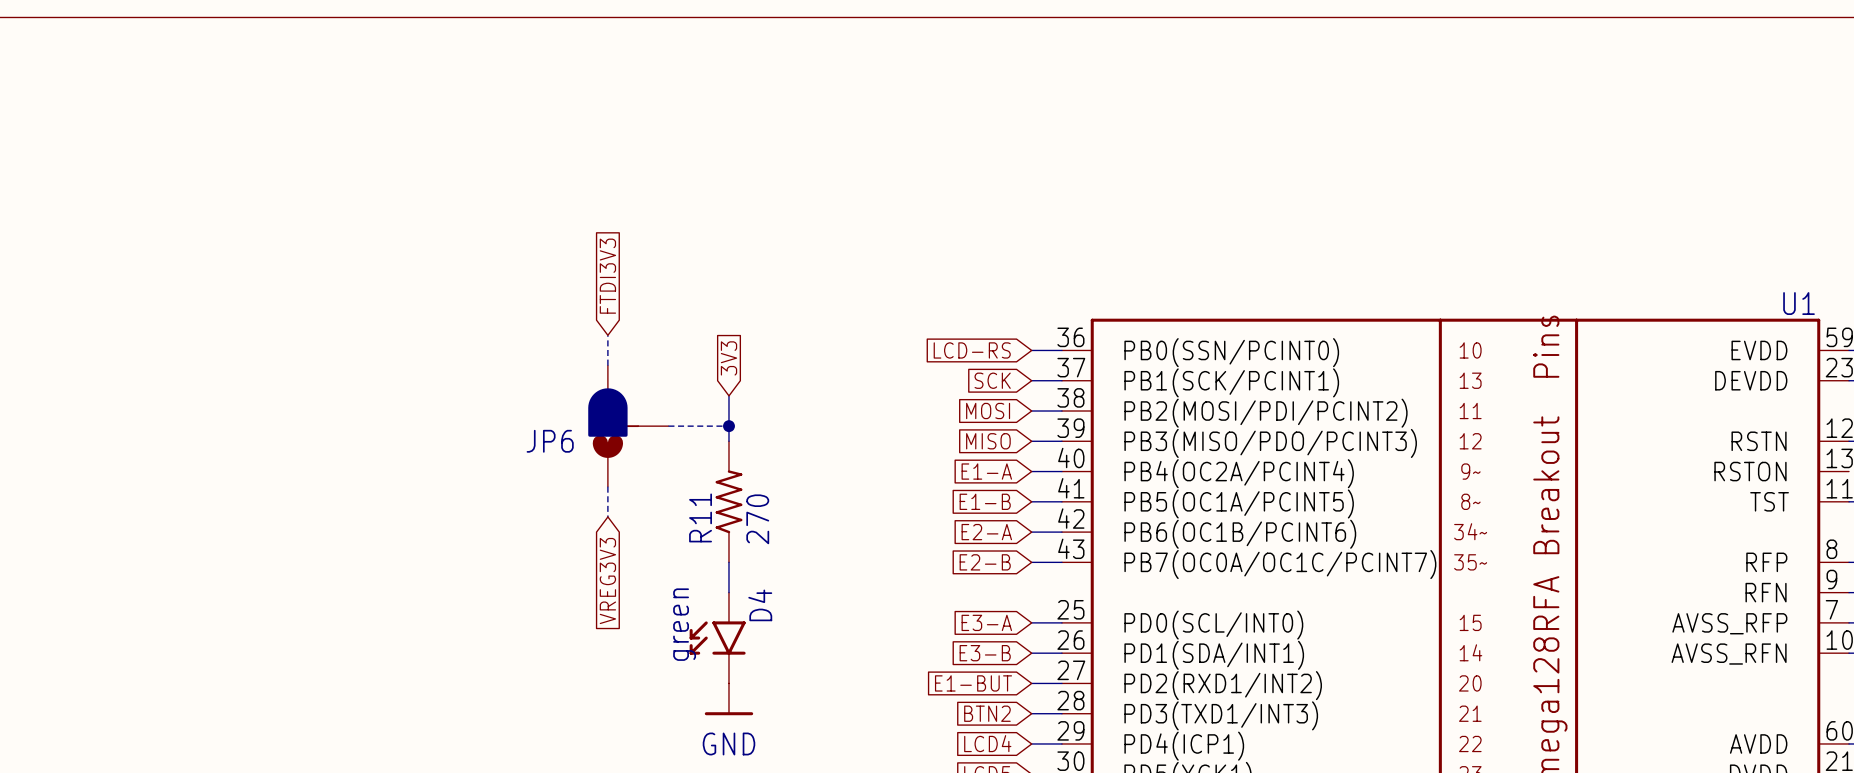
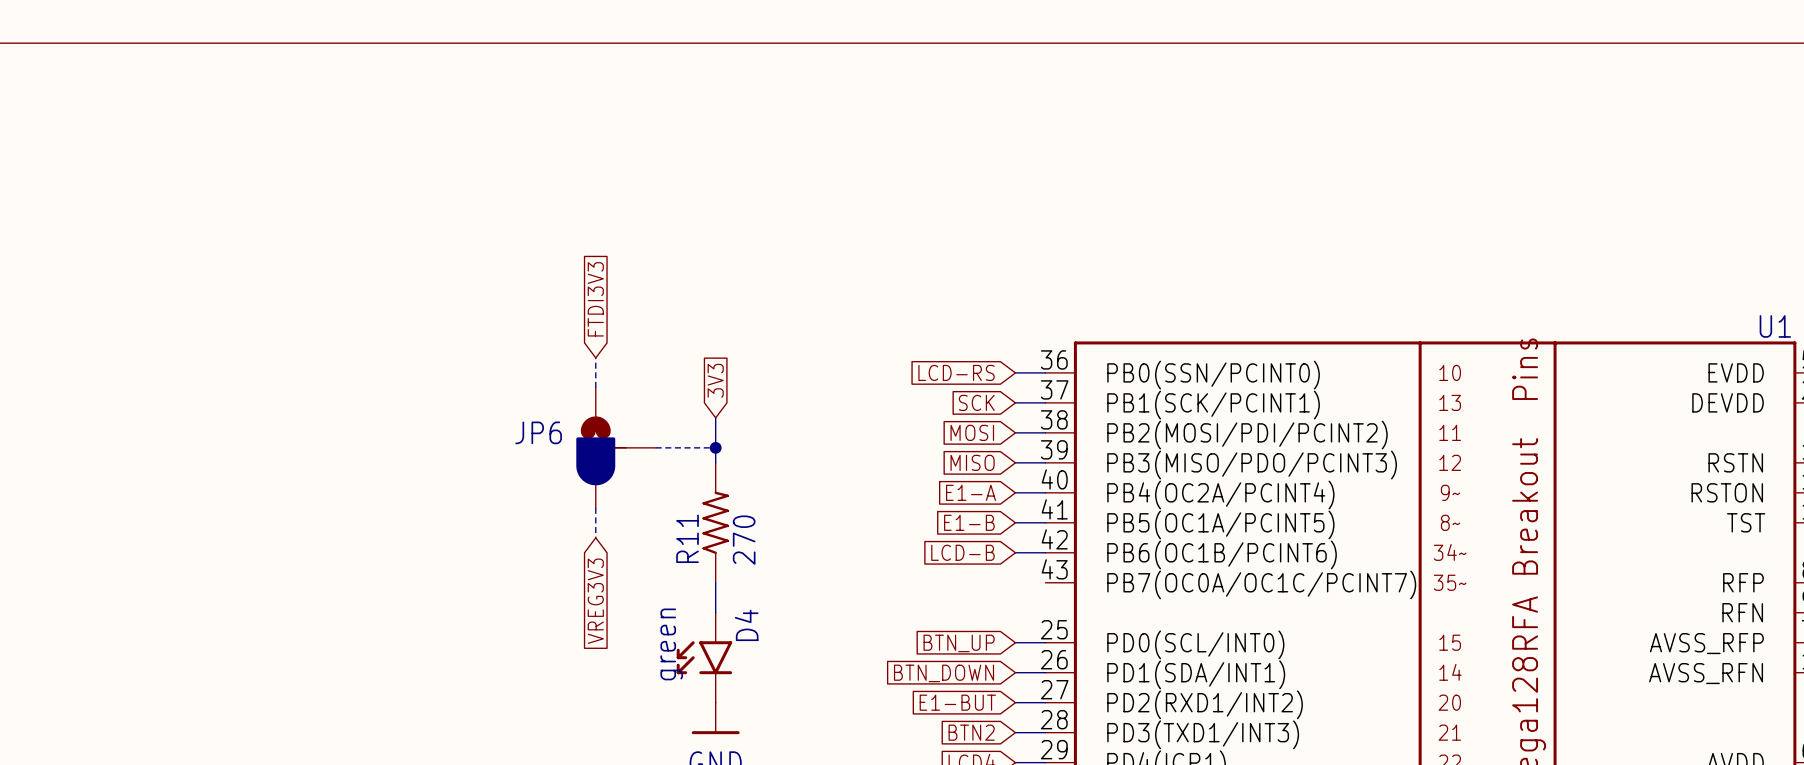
JP6 flip: as is (613, 423) -> up-down (601, 450)
global label: E2-A (986, 532) -> LCD-B (962, 552)
global label: E2-B (985, 562) -> none
wire: (1031, 562) (1061, 562) -> none
global label: E3-A (986, 622) -> BTN_UP (959, 643)
global label: E3-B (985, 653) -> BTN_DOWN (944, 673)

